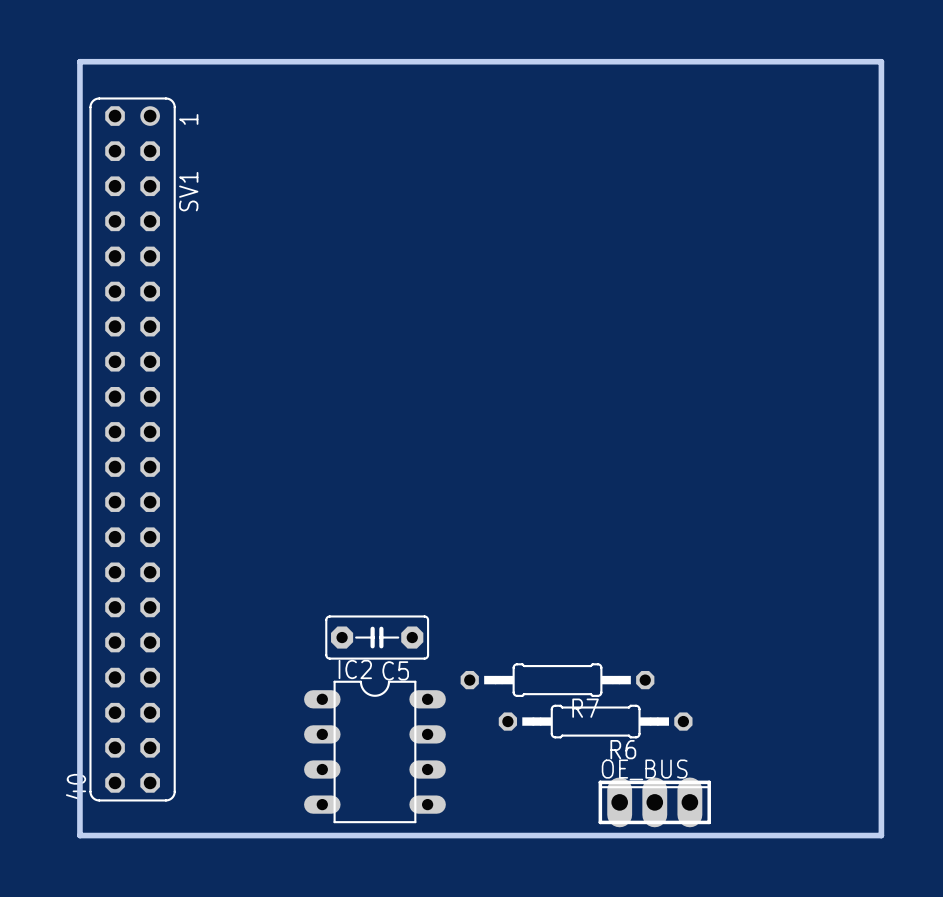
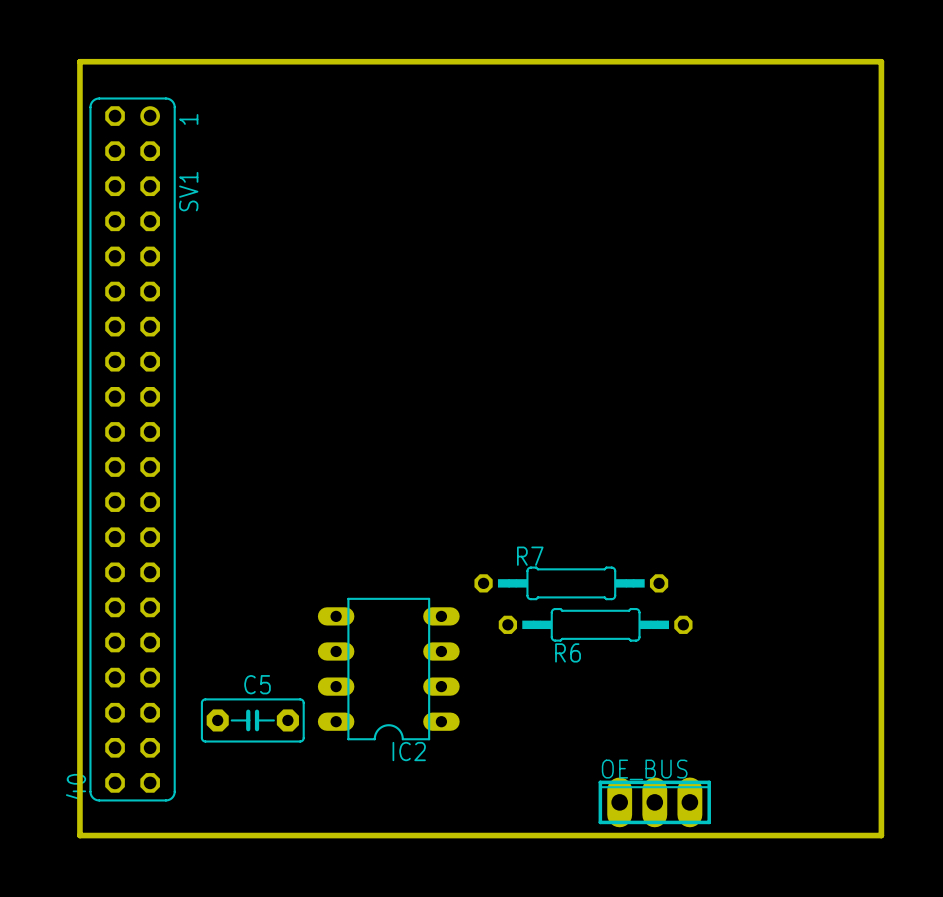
C5 position: (377, 637) -> (252, 720)
C5 name position: C5 (395, 670) -> C5 (257, 684)
R7 position: (557, 680) -> (571, 583)
R7 name position: R7 (585, 708) -> R7 (530, 556)
R6 position: (595, 721) -> (595, 624)
R6 name position: R6 (623, 749) -> R6 (568, 652)
IC2 rotation: 0° (374, 751) -> 180° (388, 669)

